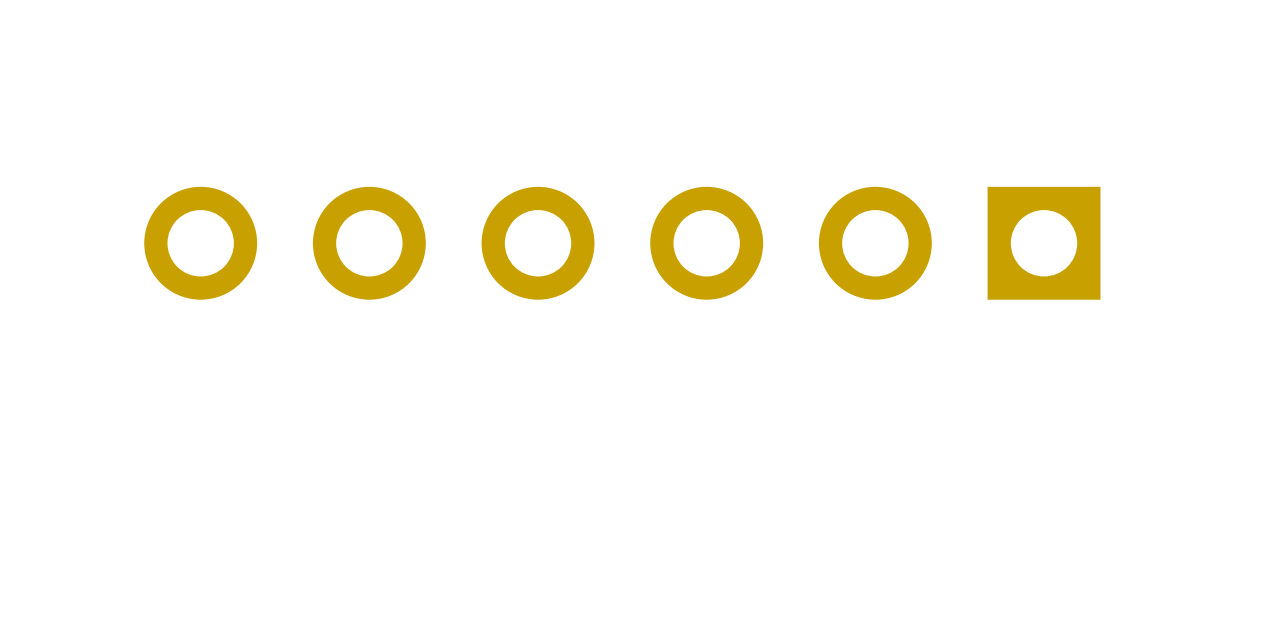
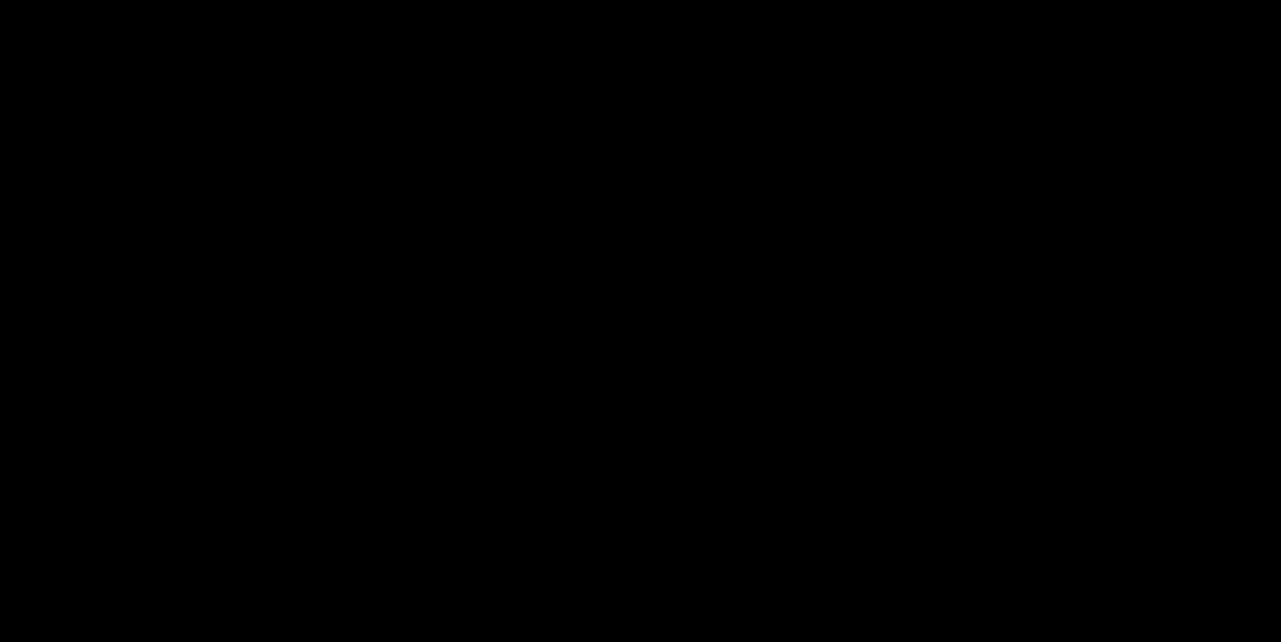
part: (622, 243) -> none

